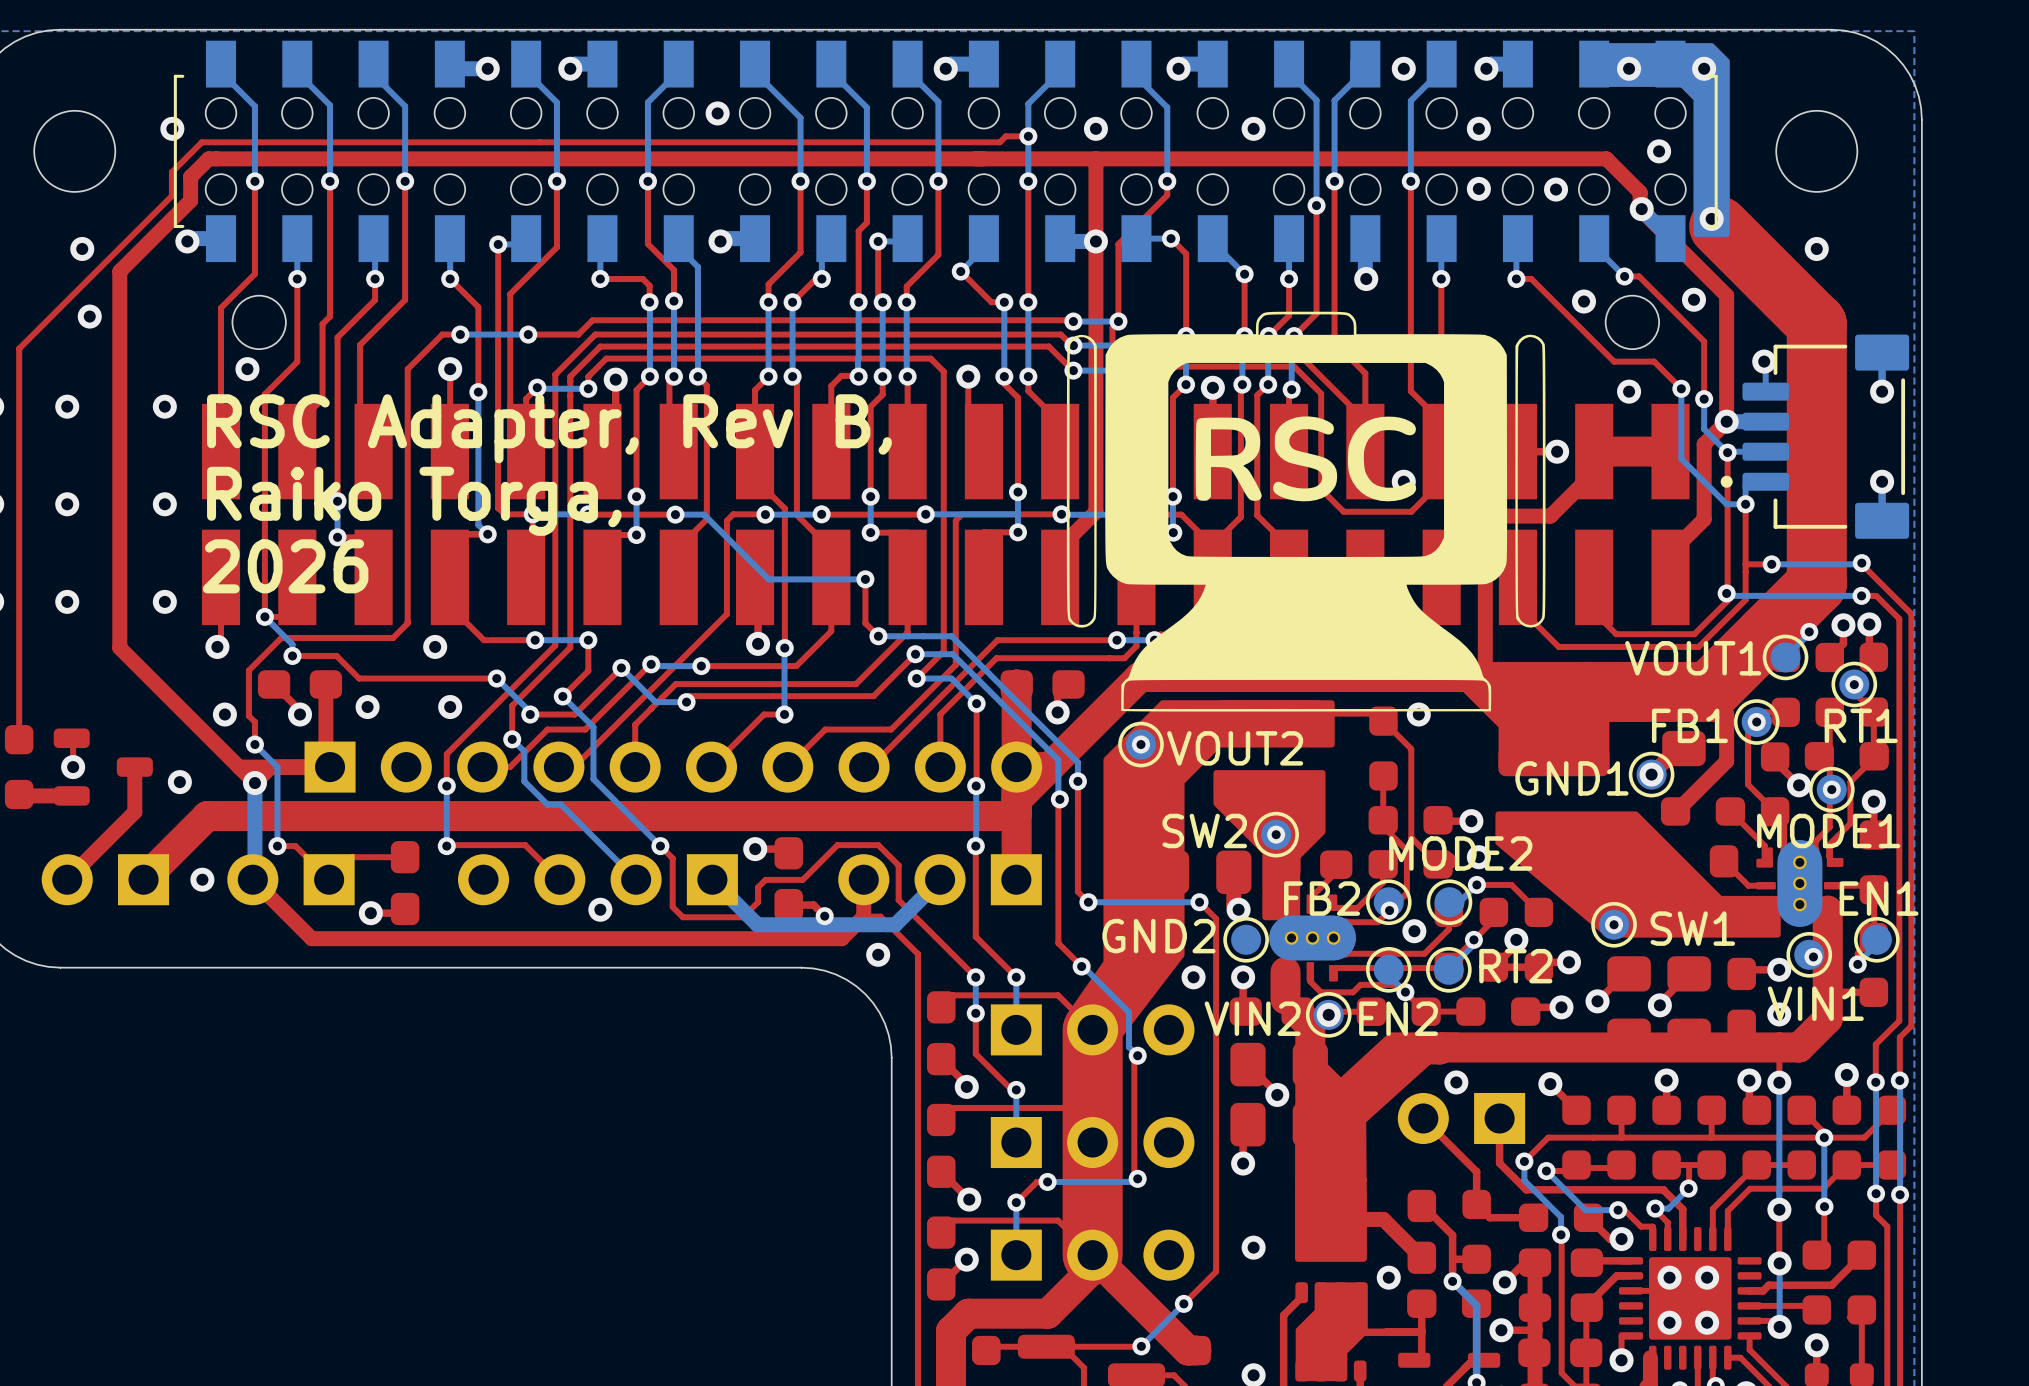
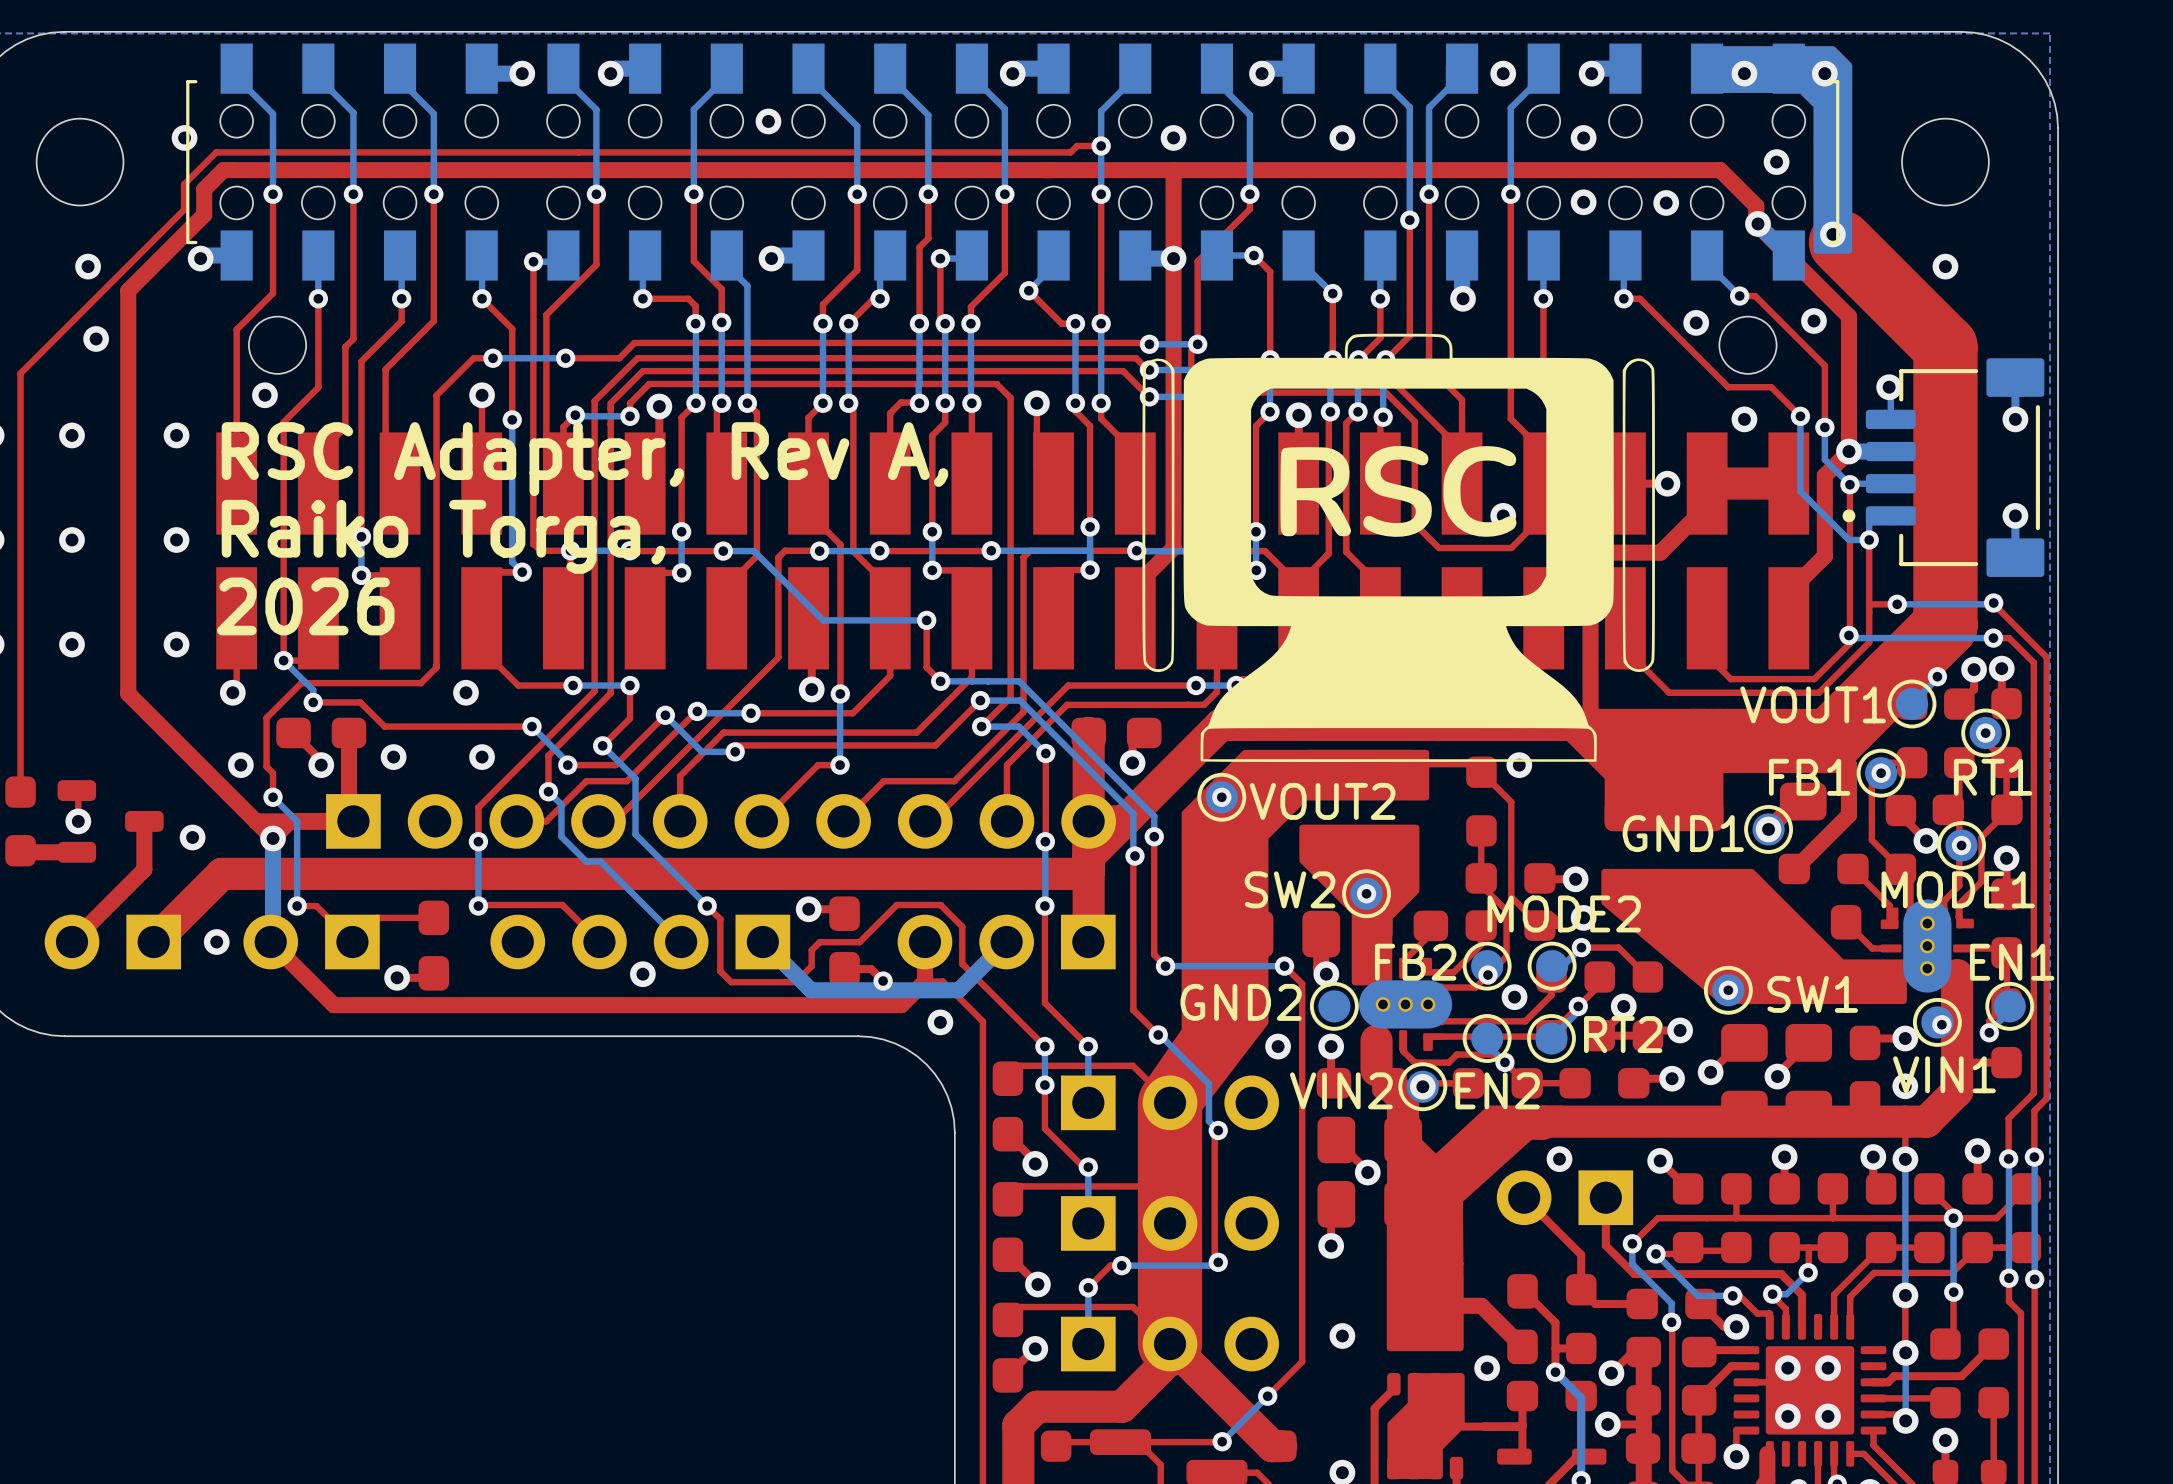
text: RSC Adapter, Rev B, (549, 428) -> RSC Adapter, Rev A, (584, 459)

